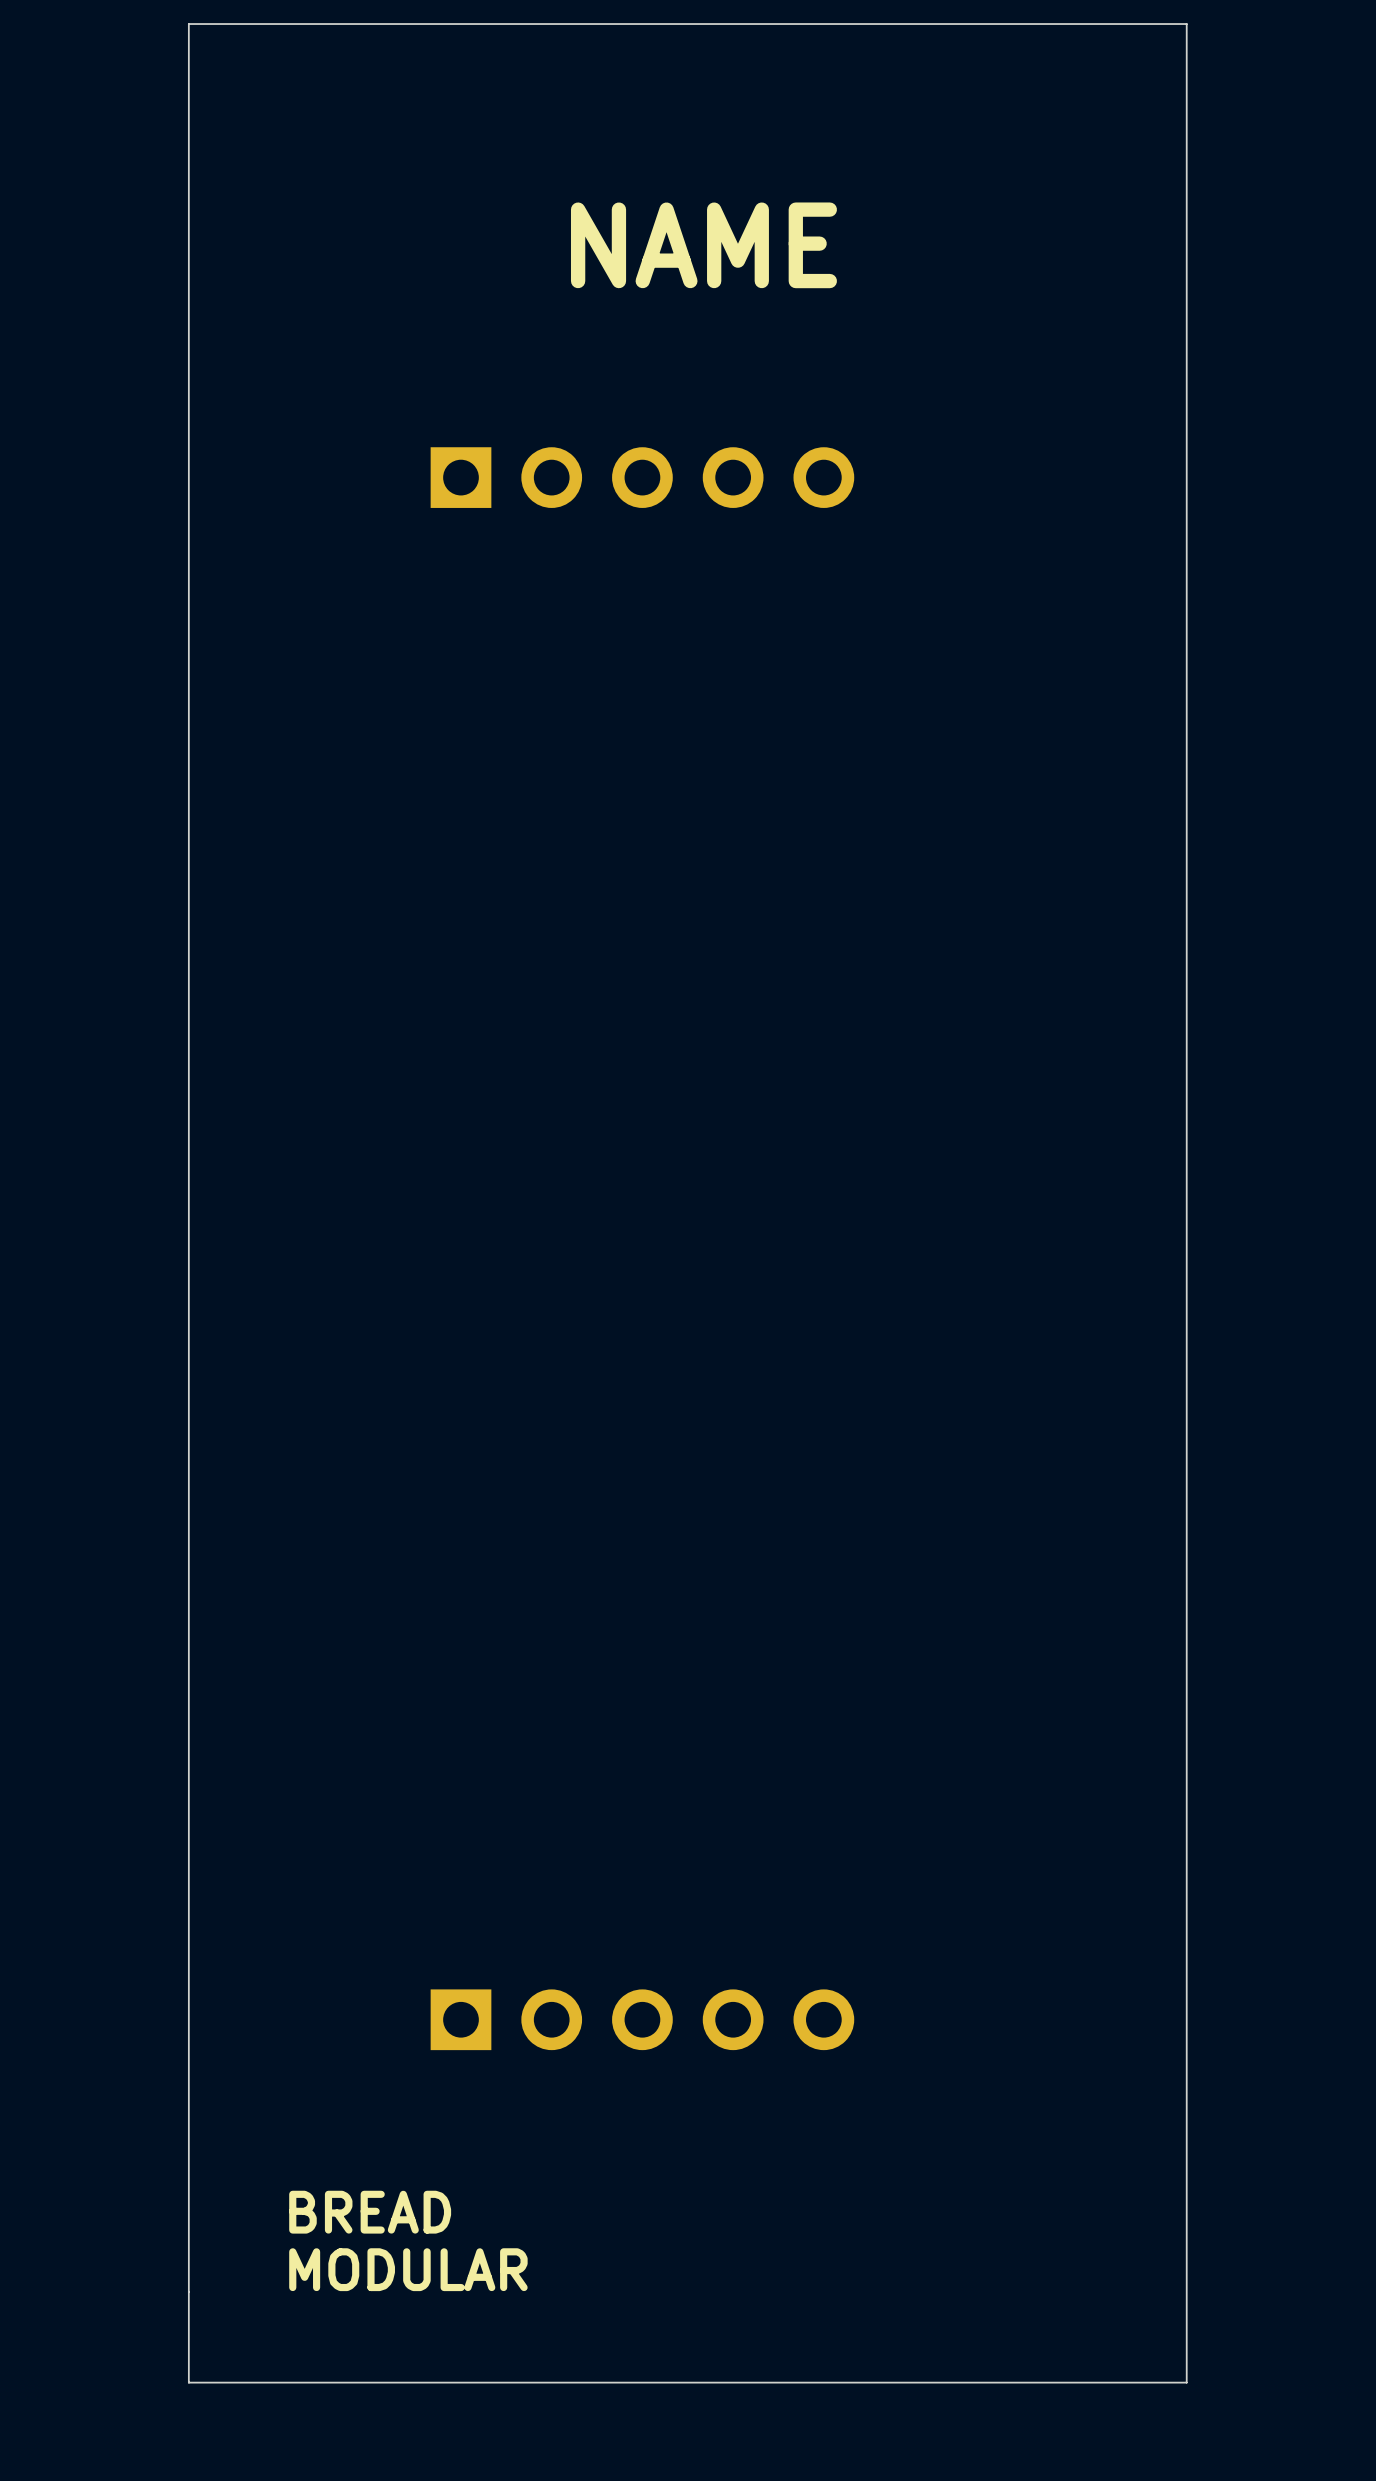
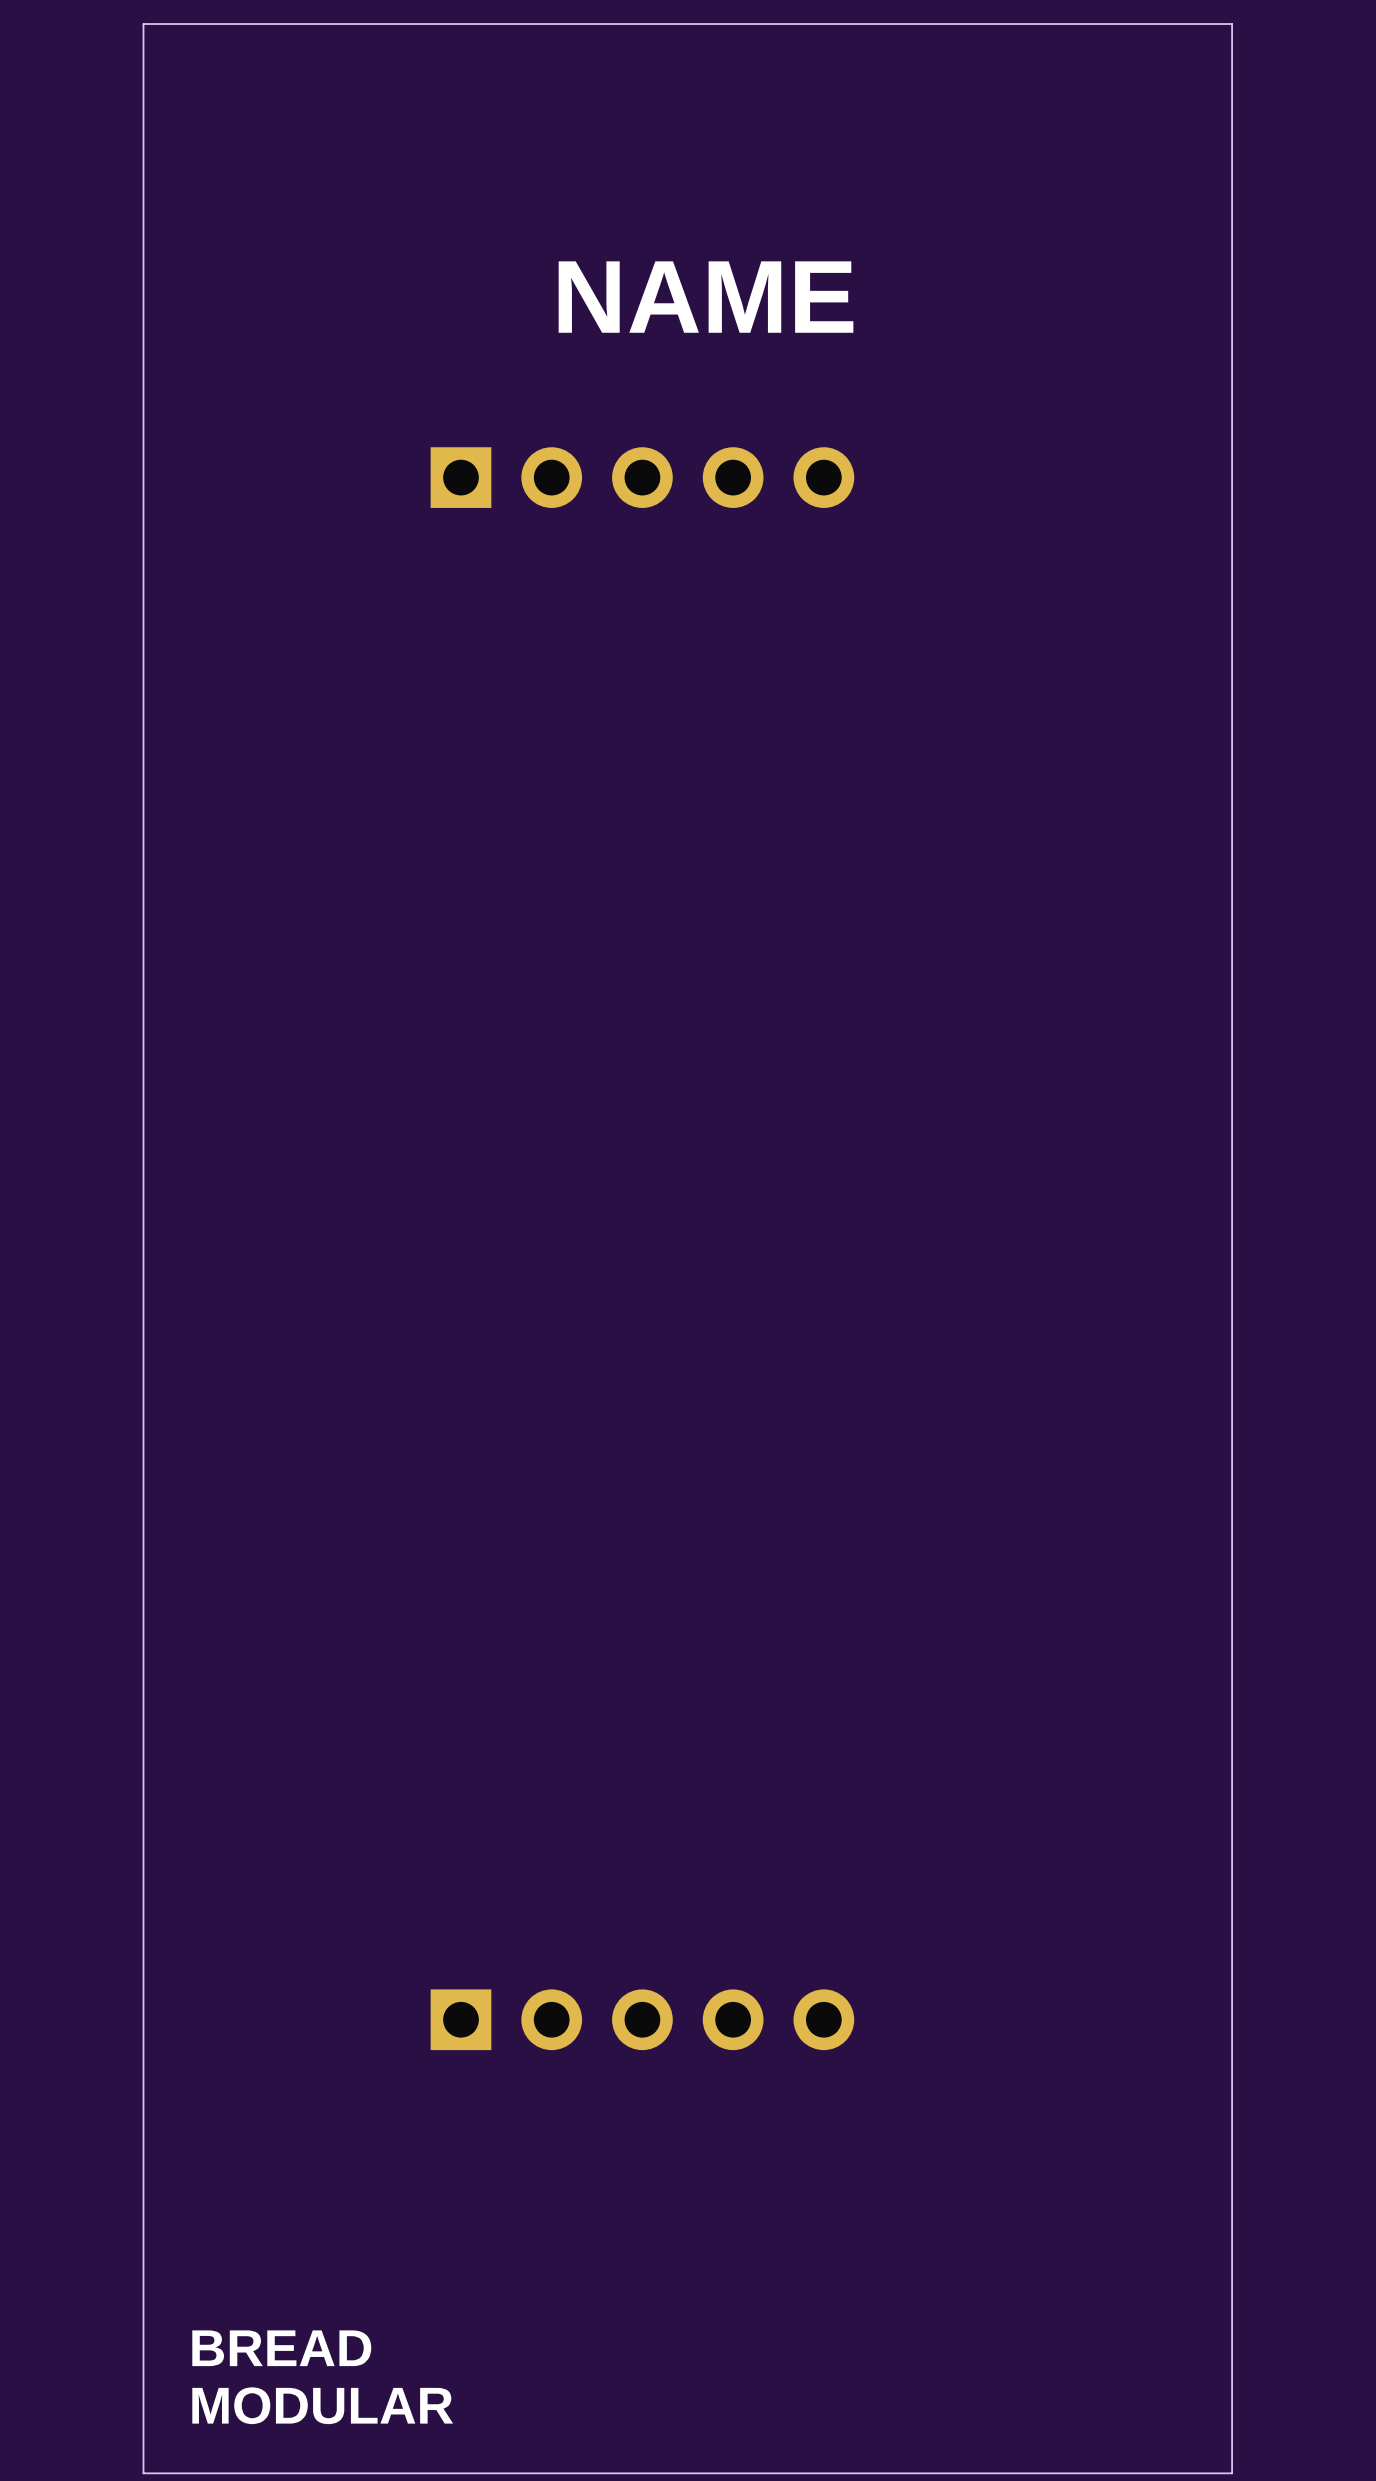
board edge: (188, 24) (188, 2382) (1186, 2382) (1186, 24) -> (188, 24) (143, 24) (143, 2473) (1232, 2473) (1232, 24) (1186, 24)
text position: NAME (703, 245) -> NAME (706, 297)
text position: BREAD (370, 2212) -> BREAD (281, 2348)
text position: MODULAR (408, 2269) -> MODULAR (322, 2405)

